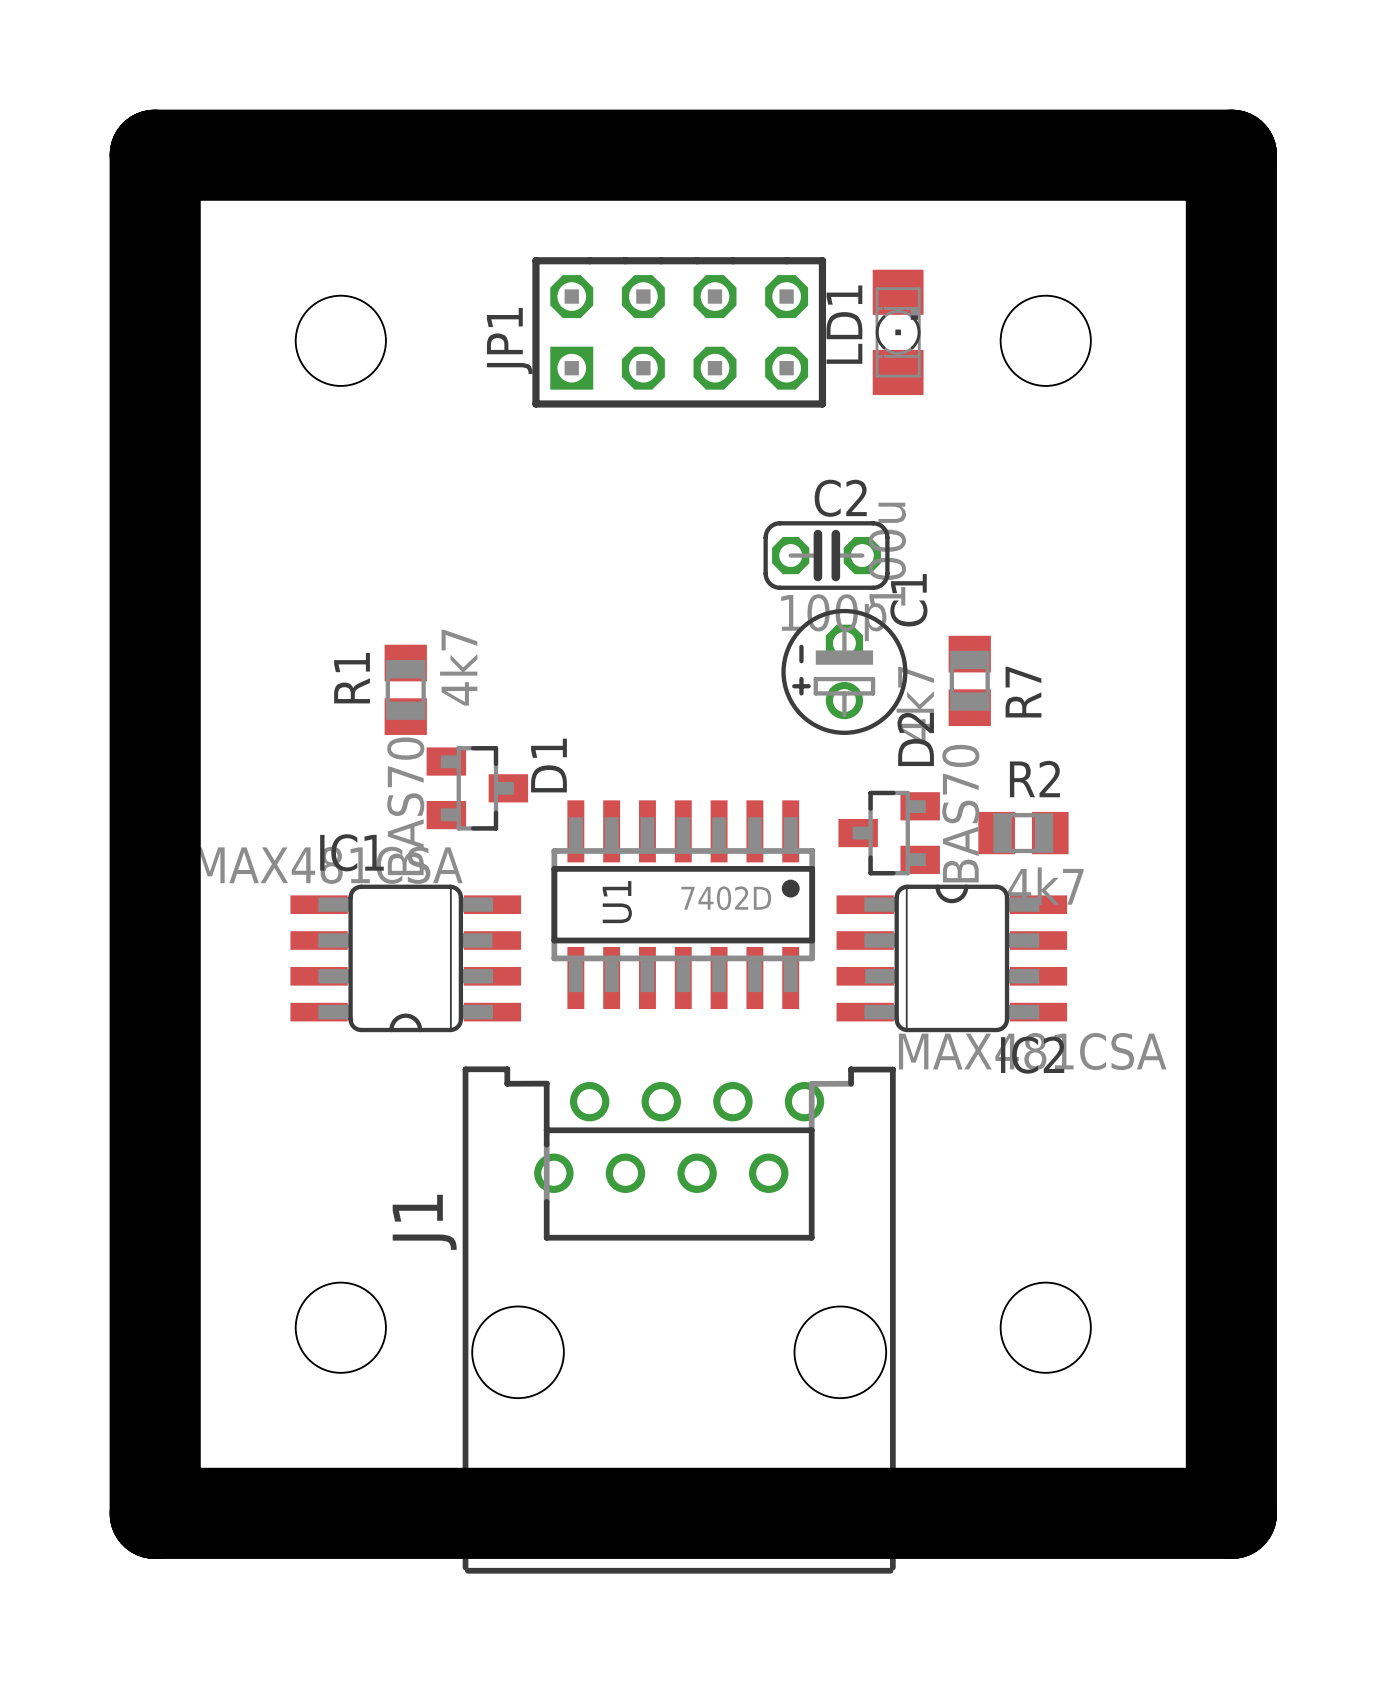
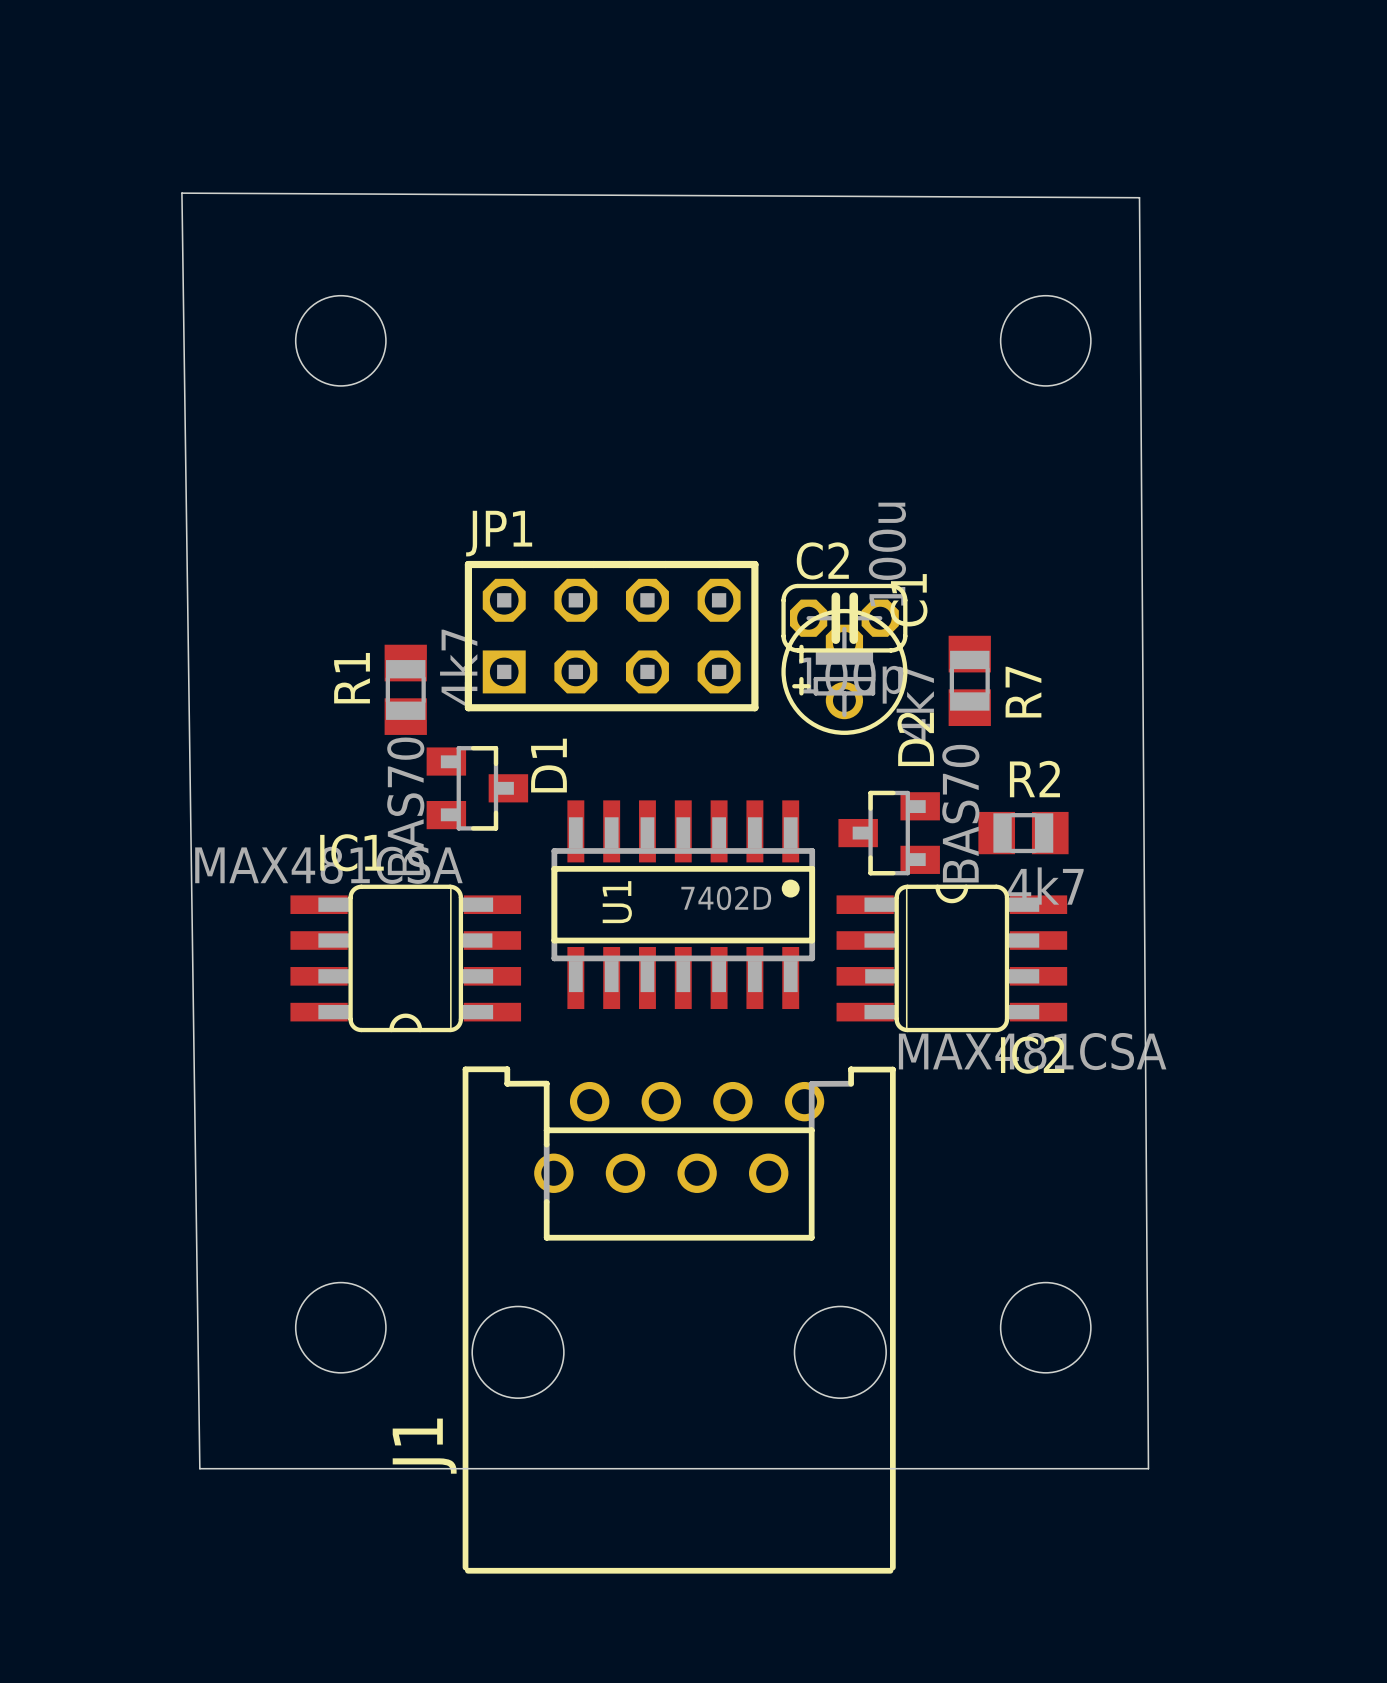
board edge: (154, 154) (154, 1513) (1231, 1513) (1231, 154) (154, 154) -> none
JP1 position: (679, 332) -> (611, 636)
LD1: (898, 332) -> none
JP1 name rotation: 0° (509, 340) -> 90° clockwise (499, 533)
JP1 name position: JP1 (509, 340) -> JP1 (499, 533)
C2 name position: C2 (840, 498) -> C2 (822, 560)
C2 position: (826, 555) -> (844, 618)
J1 name position: J1 (424, 1222) -> J1 (424, 1446)
board edge: (199, 1468) (199, 199) (1186, 199) (1186, 1468) (1148, 1468) -> (199, 1468) (181, 193) (1139, 197) (1148, 1468)

